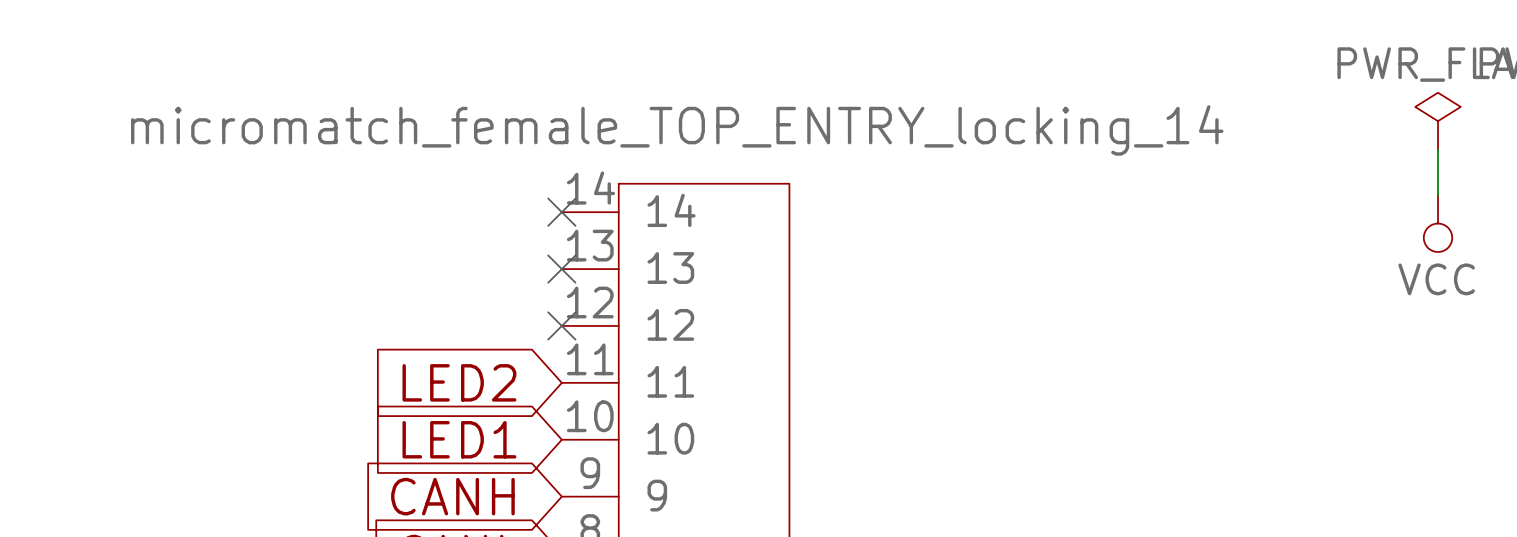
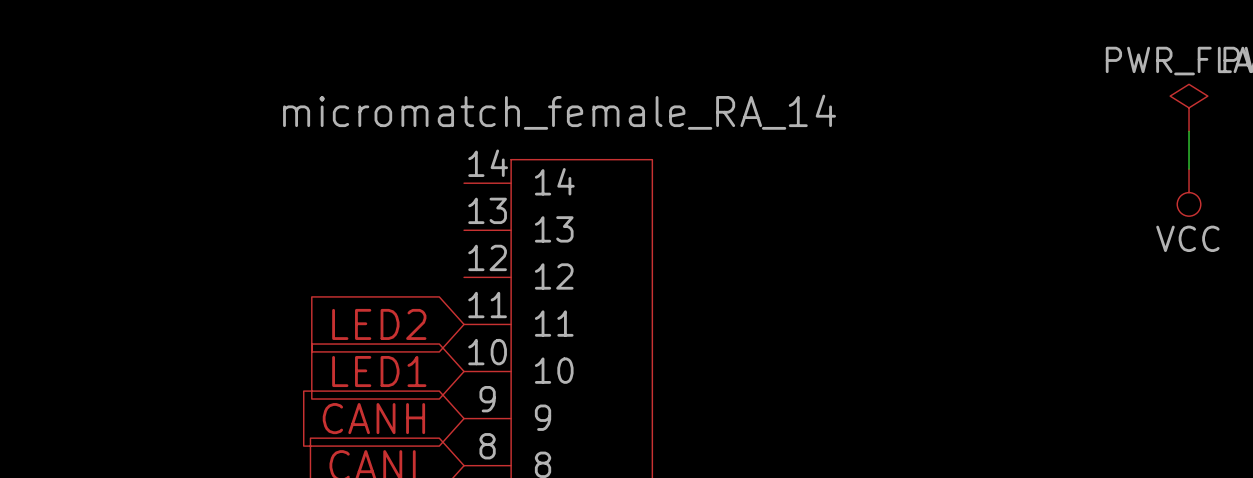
part value: micromatch_female_TOP_ENTRY_locking_14 (677, 130) -> micromatch_female_RA_14 (559, 112)
no-connect mark: (561, 212) -> none
no-connect mark: (561, 269) -> none
no-connect mark: (561, 325) -> none

